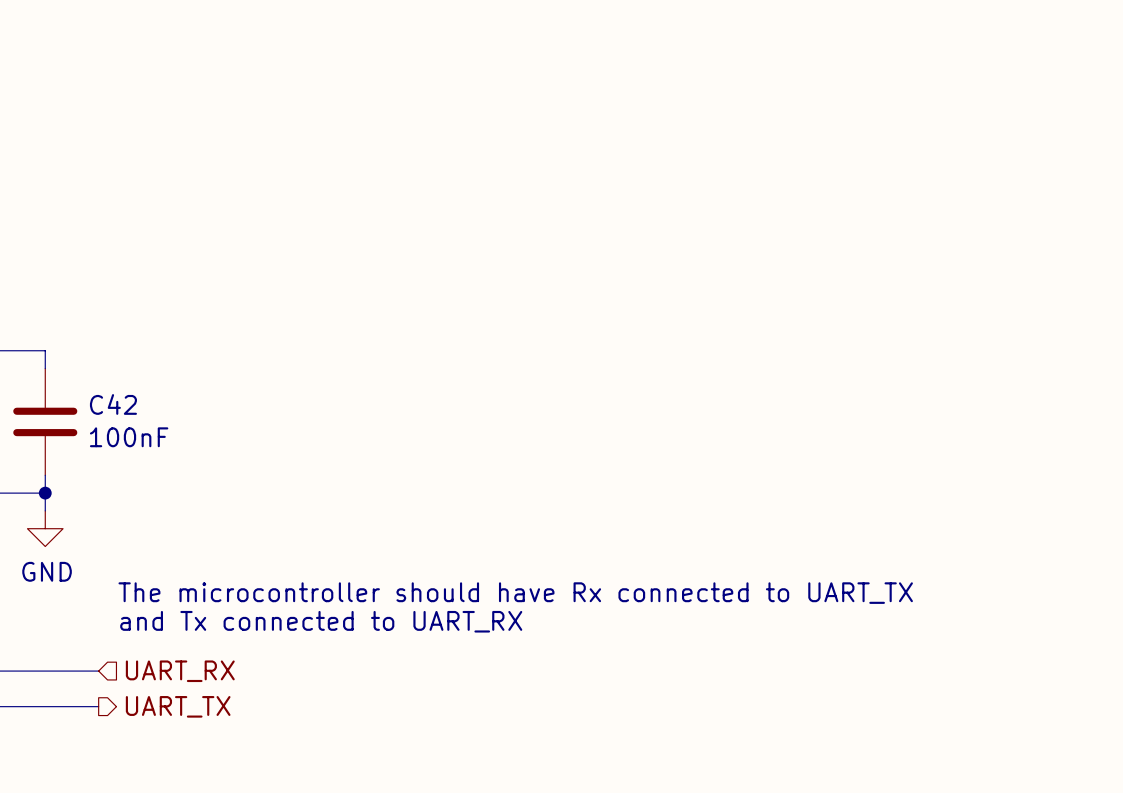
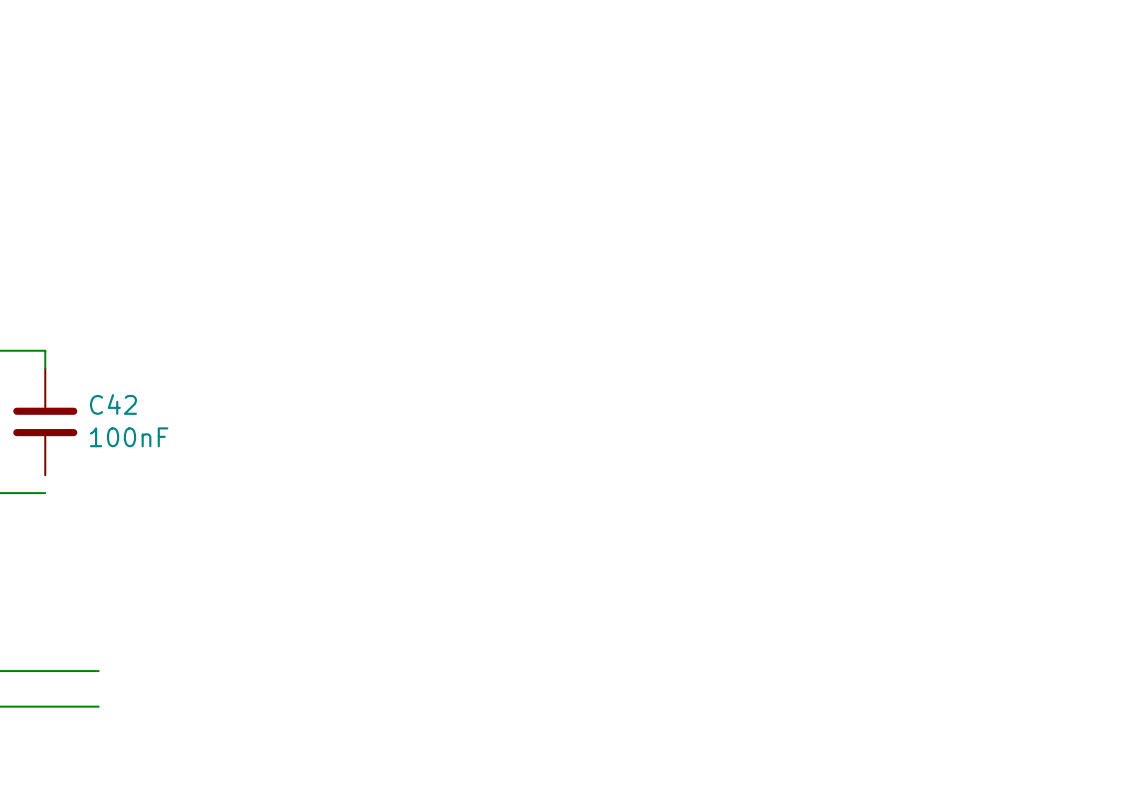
wire: (45, 475) (45, 510) -> none
junction: (45, 493) -> none
power symbol: GND (45, 528) -> none
text: The microcontroller should have Rx connected to UART_TX (515, 593) -> none
text: and Tx connected to UART_RX (321, 621) -> none
hierarchical label: UART_RX (180, 671) -> none
hierarchical label: UART_TX (178, 706) -> none

